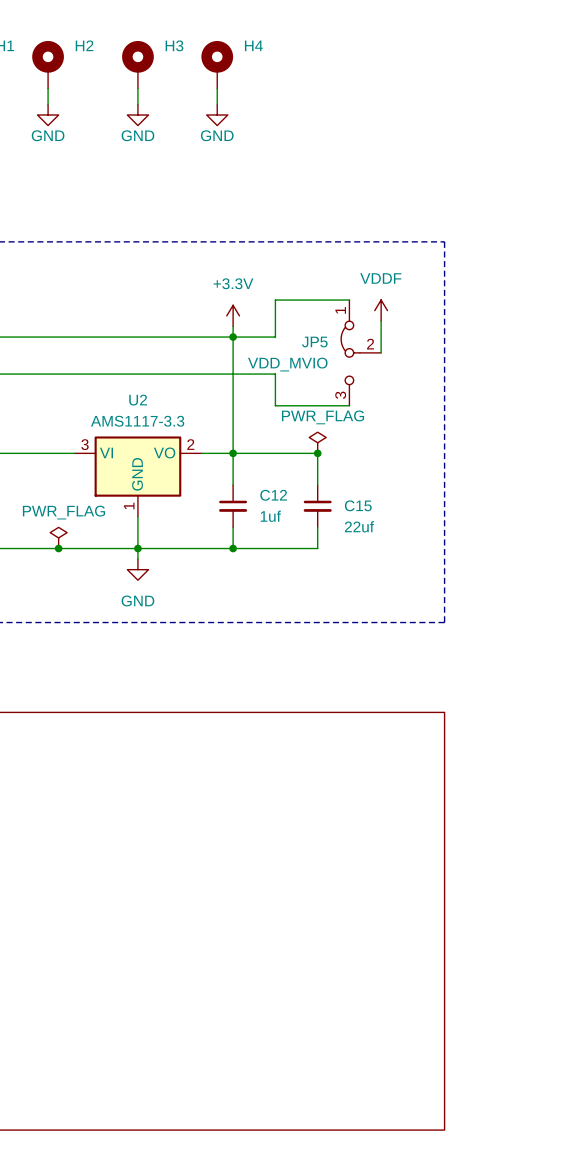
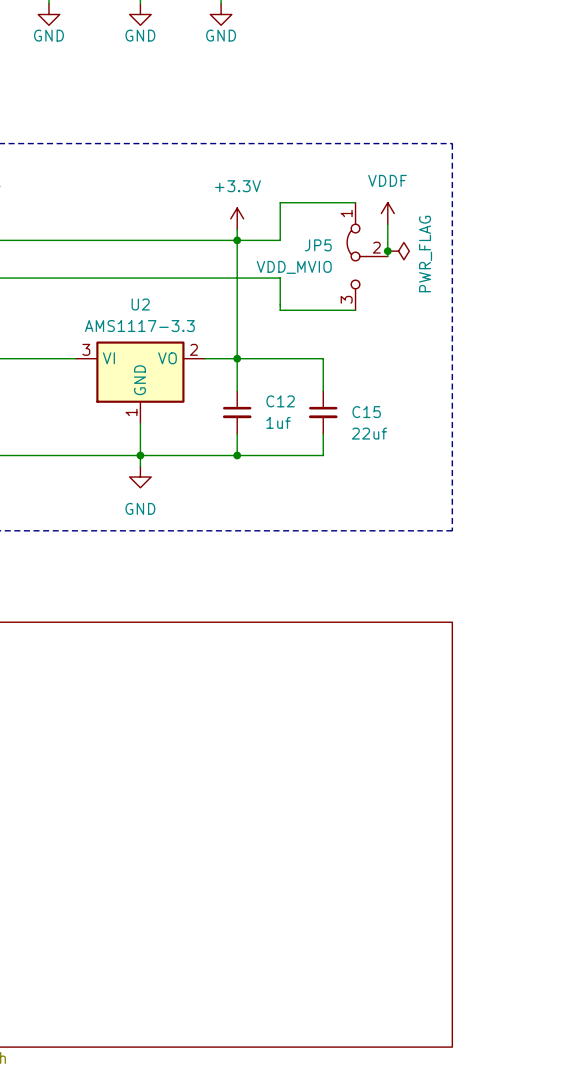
junction: none -> (387, 251)
power symbol rotation: 0° (317, 442) -> 90° clockwise (398, 251)
power symbol position: PWR_FLAG (317, 442) -> PWR_FLAG (398, 251)
junction: (317, 453) -> none
power symbol: PWR_FLAG (58, 537) -> none
junction: (58, 548) -> none

